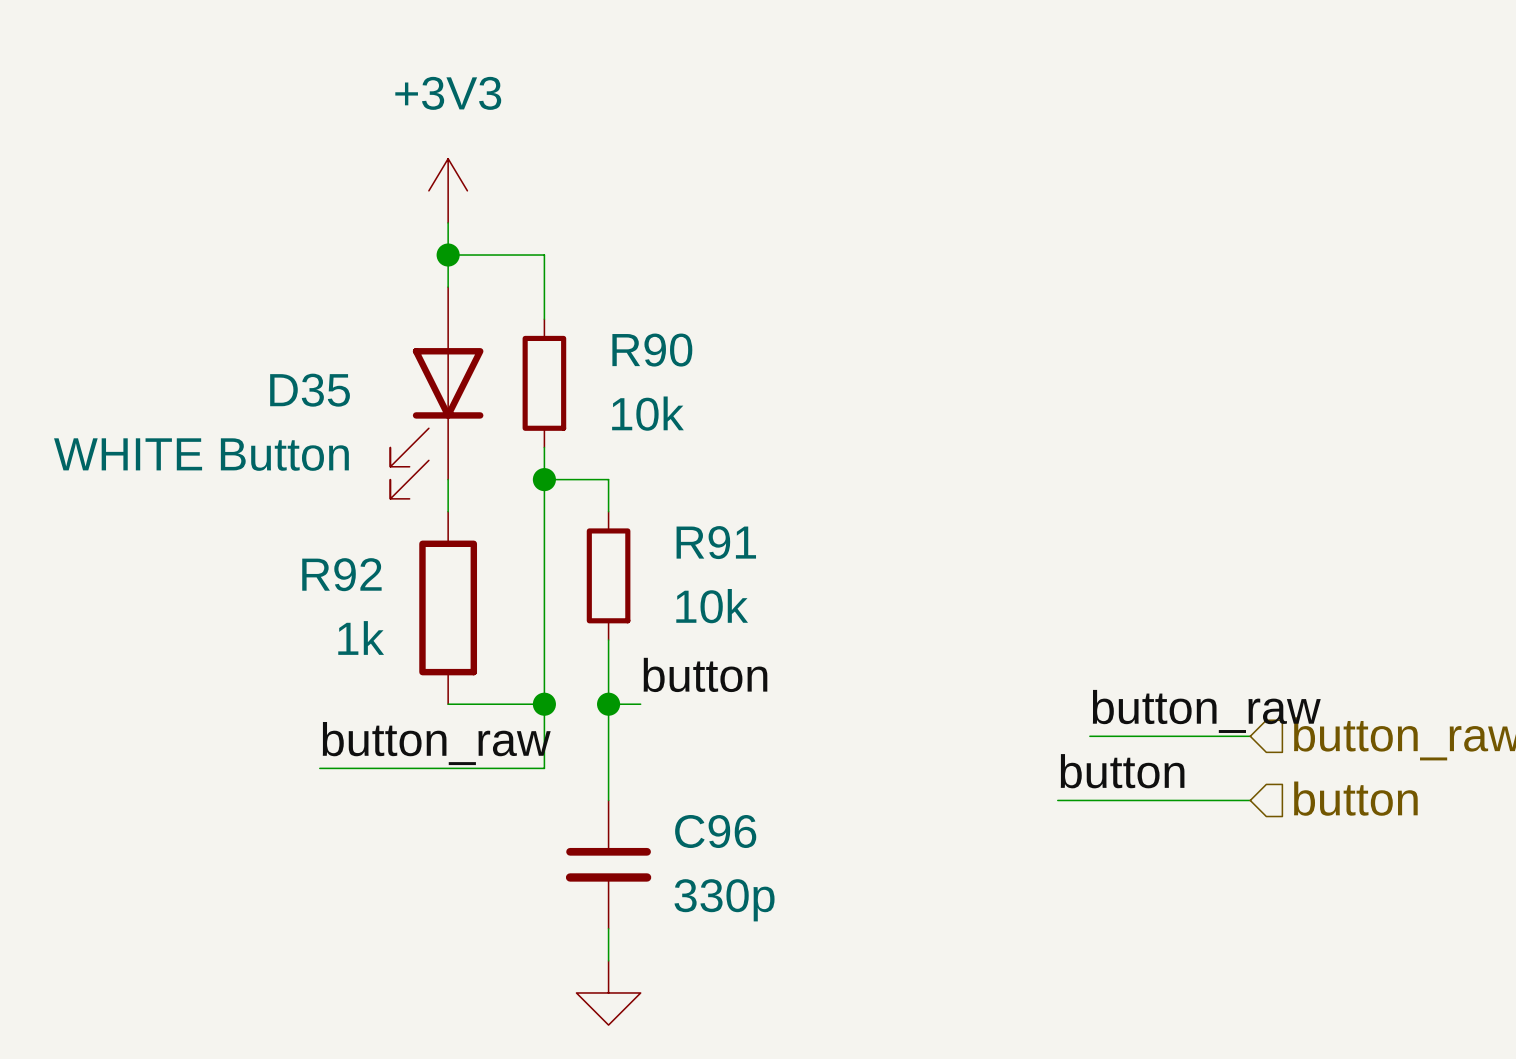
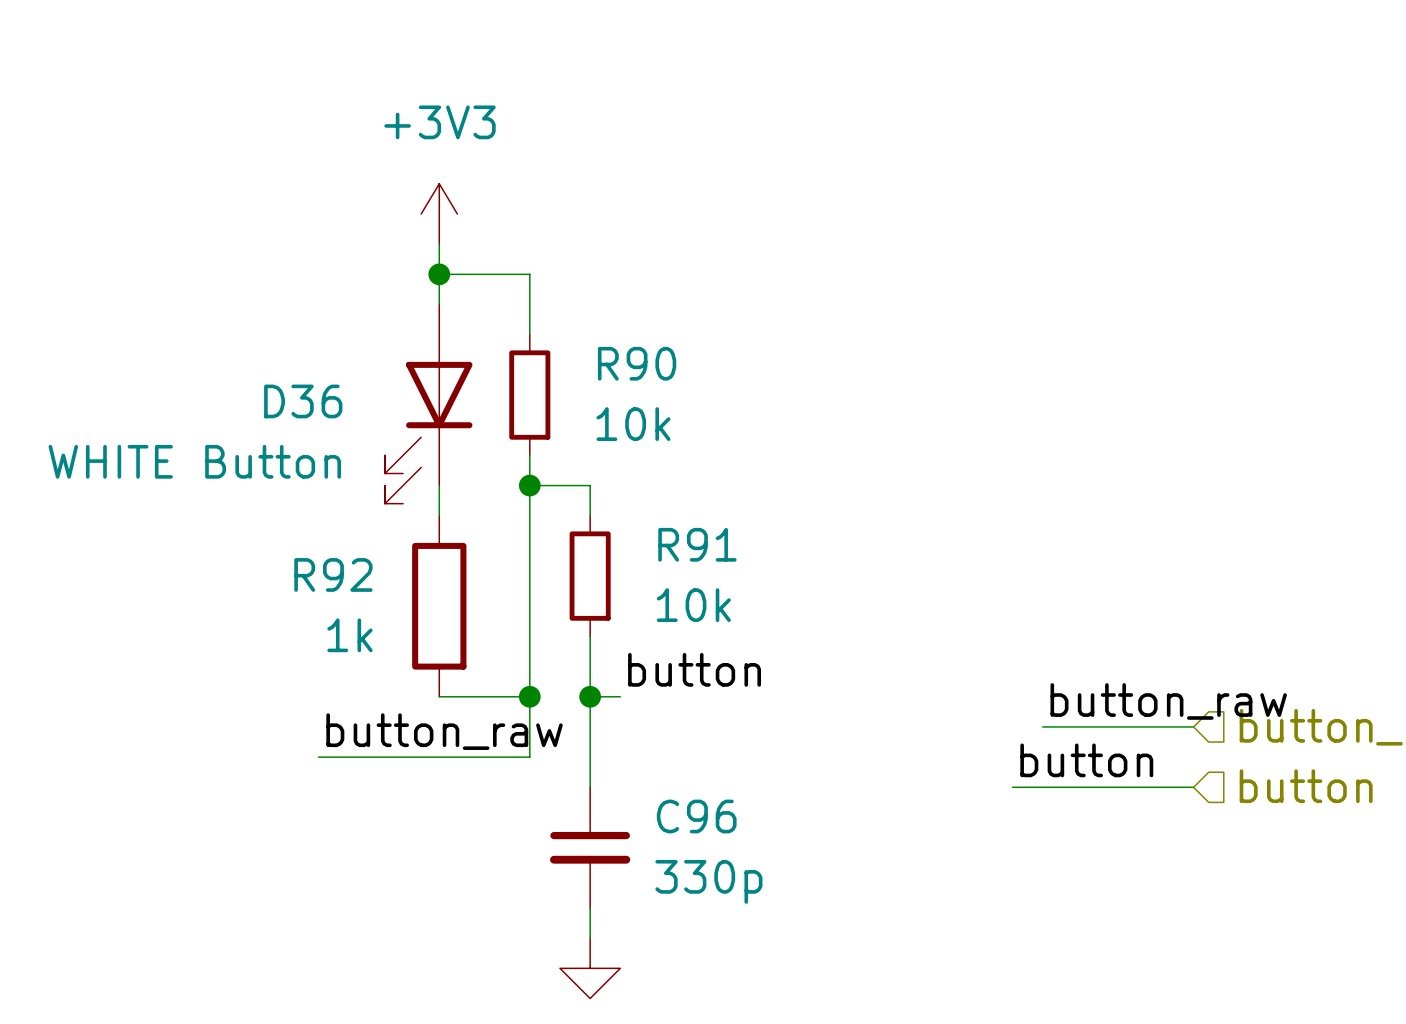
D35 name: D35 (310, 390) -> D36 (303, 401)

